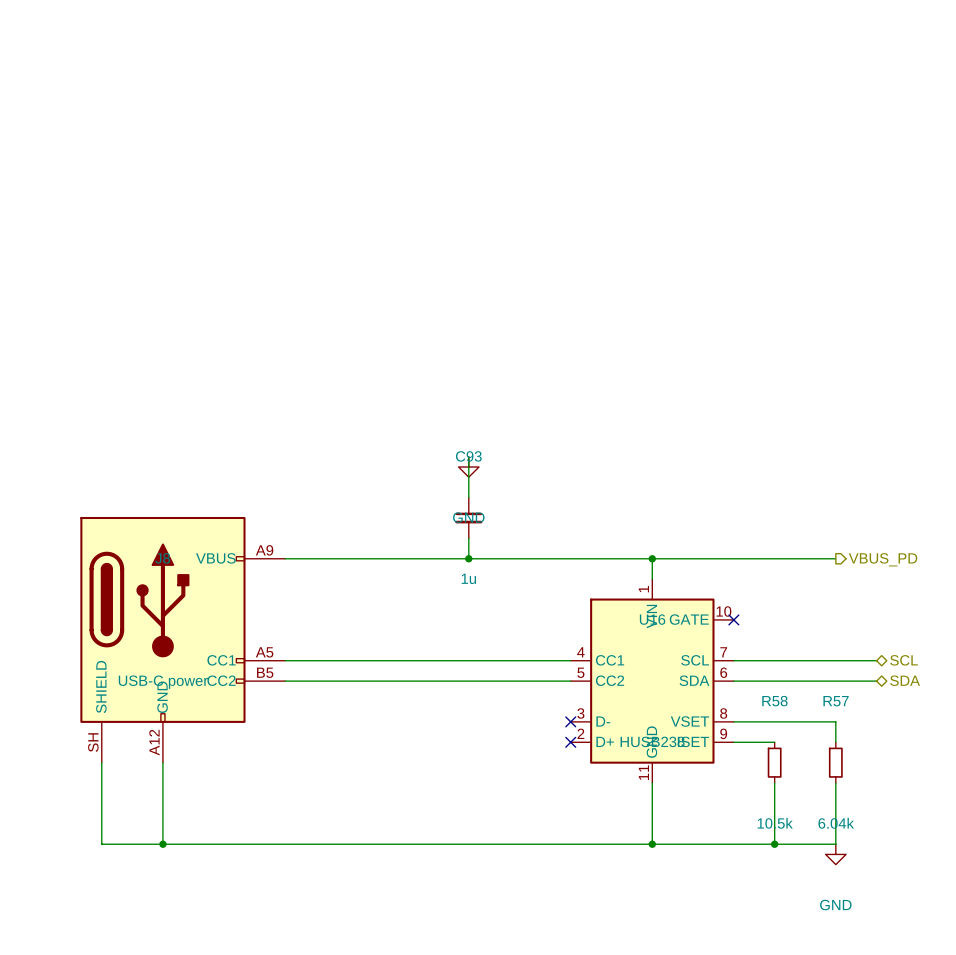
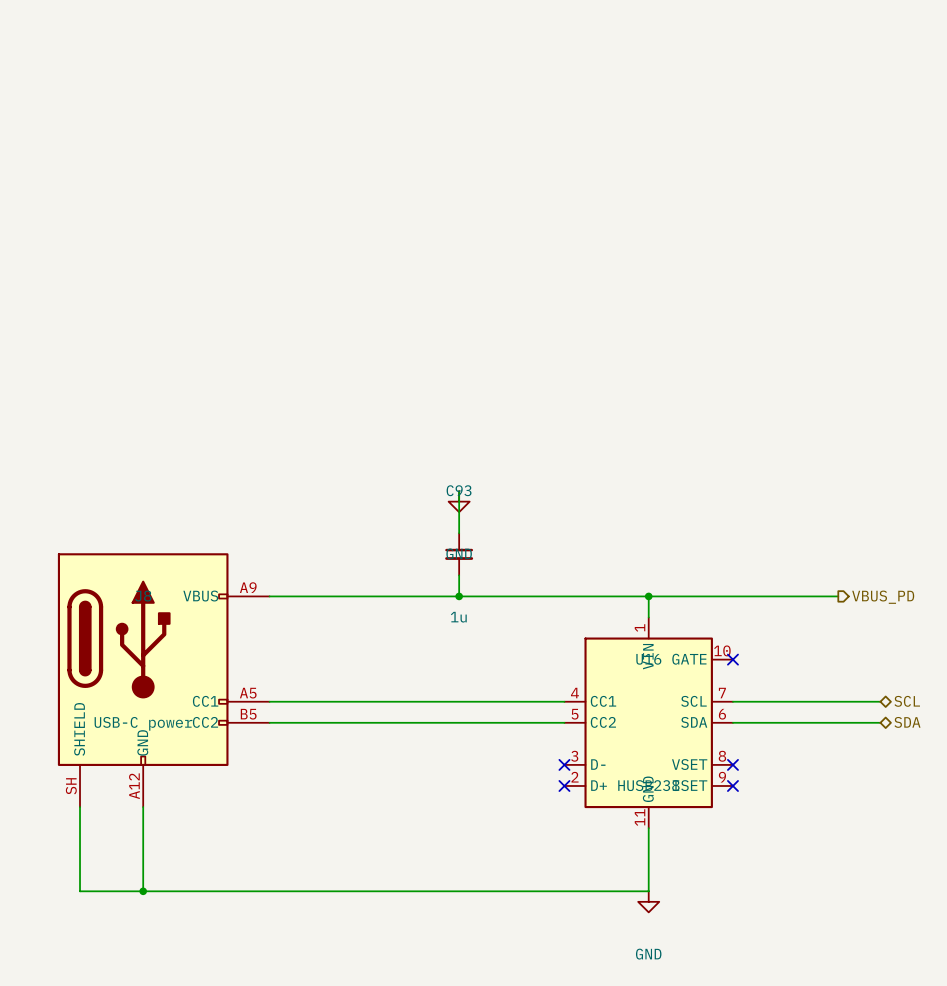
wire: (733, 721) (835, 721) (835, 742) -> none
no-connect mark: none -> (732, 764)
wire: (733, 742) (774, 742) -> none
no-connect mark: none -> (732, 785)
R58: 10.5k (774, 762) -> none
R57: 6.04k (835, 762) -> none
wire: (774, 783) (774, 844) -> none
wire: (835, 783) (835, 844) (652, 844) -> none
junction: (652, 844) -> none
junction: (774, 844) -> none
power symbol position: GND (835, 854) -> GND (648, 901)

